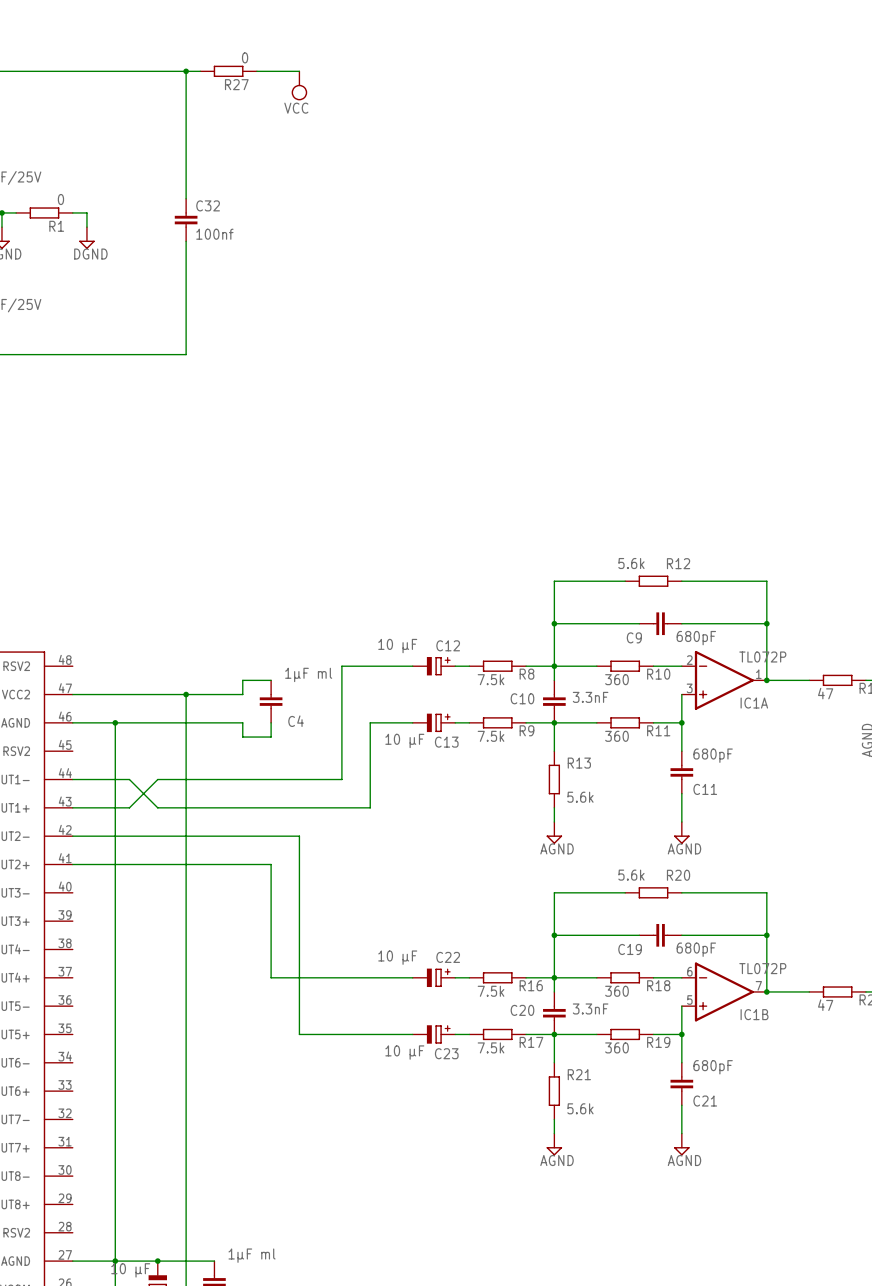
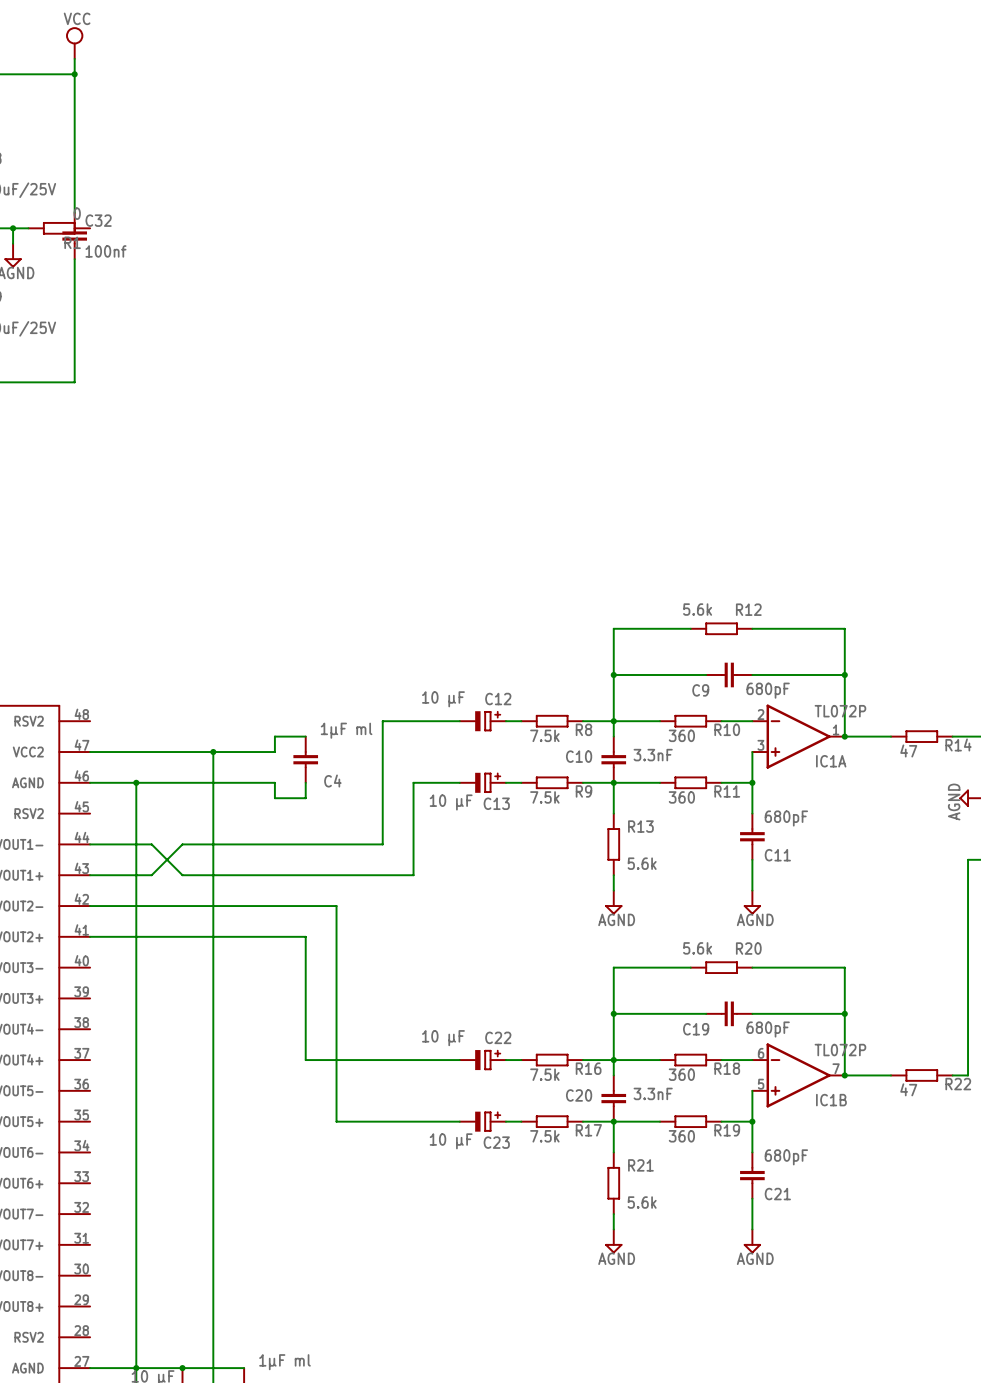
power symbol: none -> VCC (74, 43)
wire: none -> (74, 58) (74, 212)
wire: (58, 71) (200, 71) -> none
junction: none -> (74, 74)
wire: (186, 71) (186, 198) -> none
junction: (186, 71) -> none
R27: 0 (228, 71) -> none
wire: (256, 71) (299, 71) -> none
power symbol: VCC (299, 85) -> none
wire: (72, 212) (86, 212) (86, 227) -> none
C32 position: (186, 220) -> (74, 236)
power symbol: DGND (86, 238) -> none
wire: (186, 241) (186, 354) (58, 354) -> (74, 259) (74, 382)

